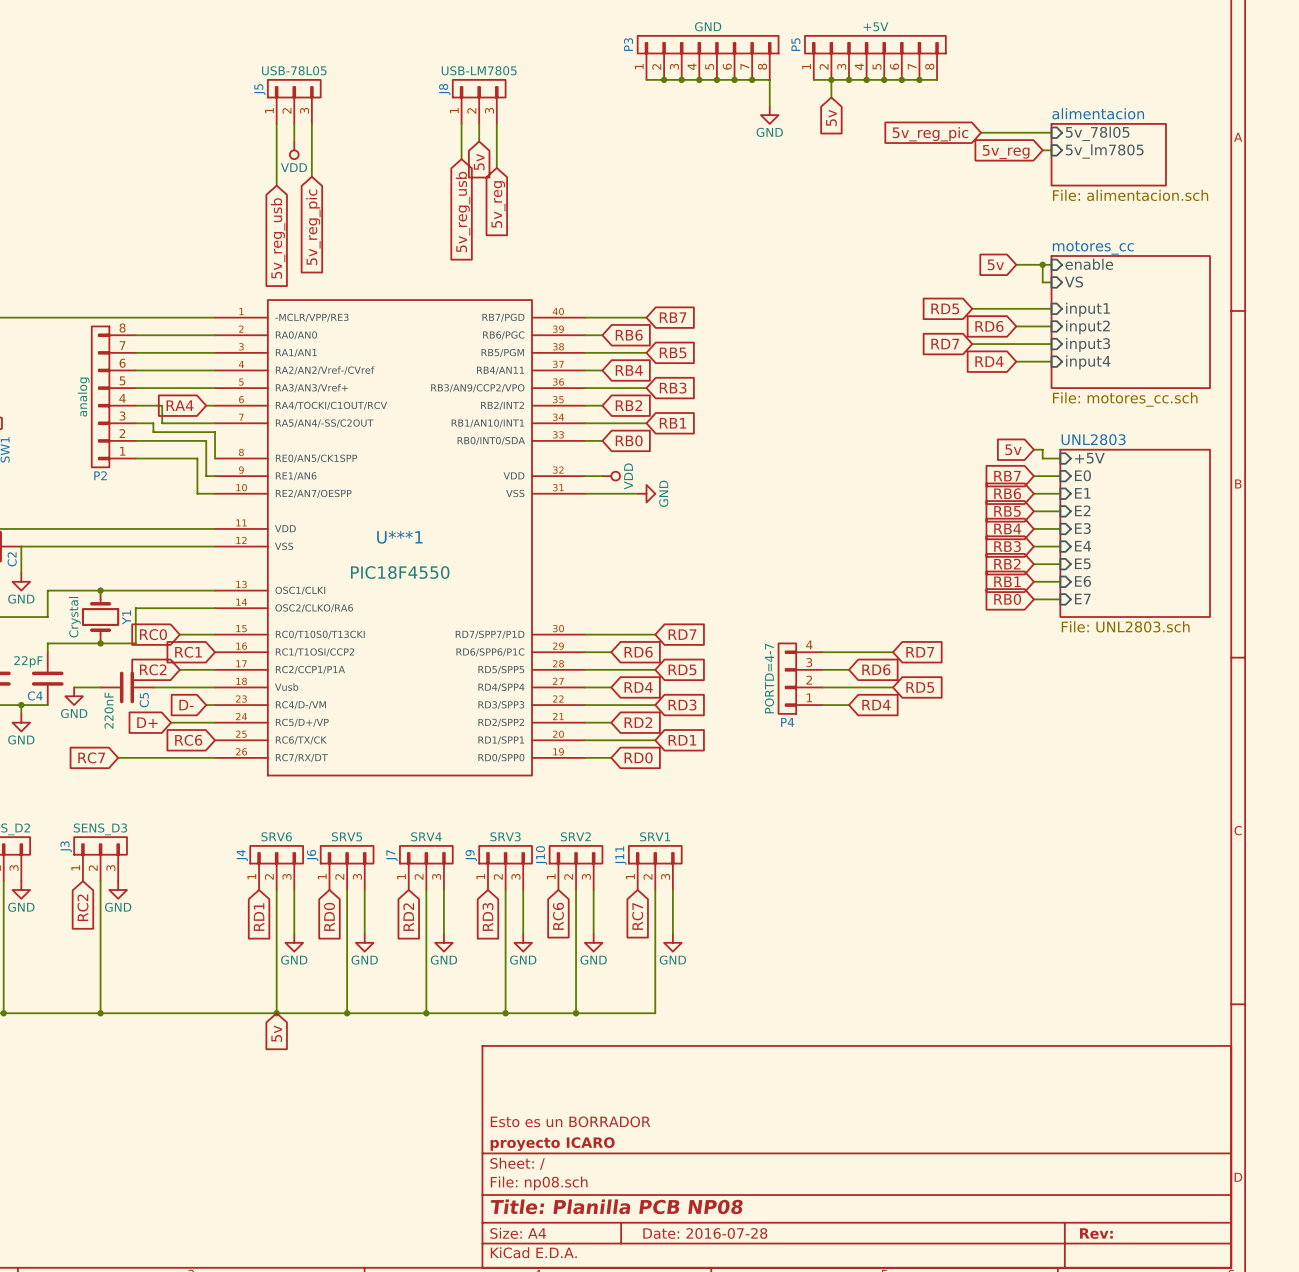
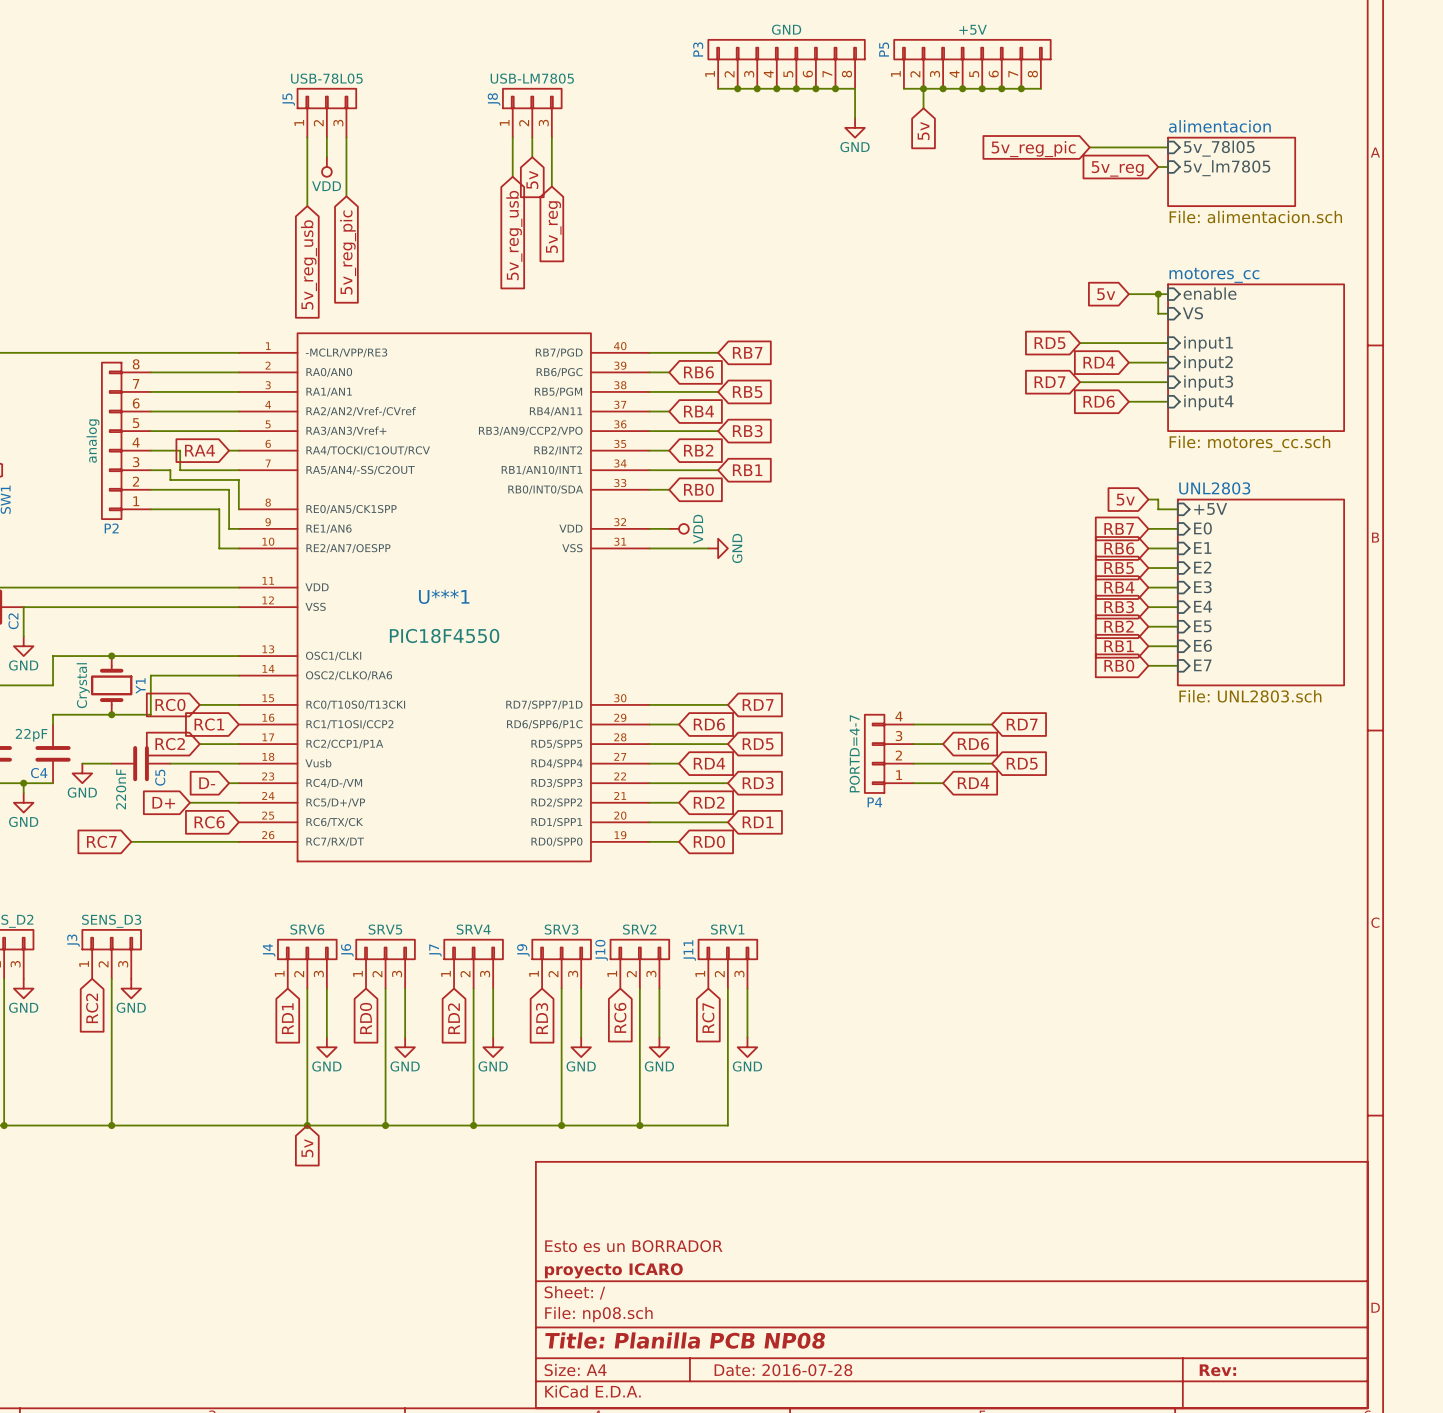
global label: RD6 (989, 326) -> RD4 (1099, 362)
global label: RD4 (989, 361) -> RD6 (1099, 401)

